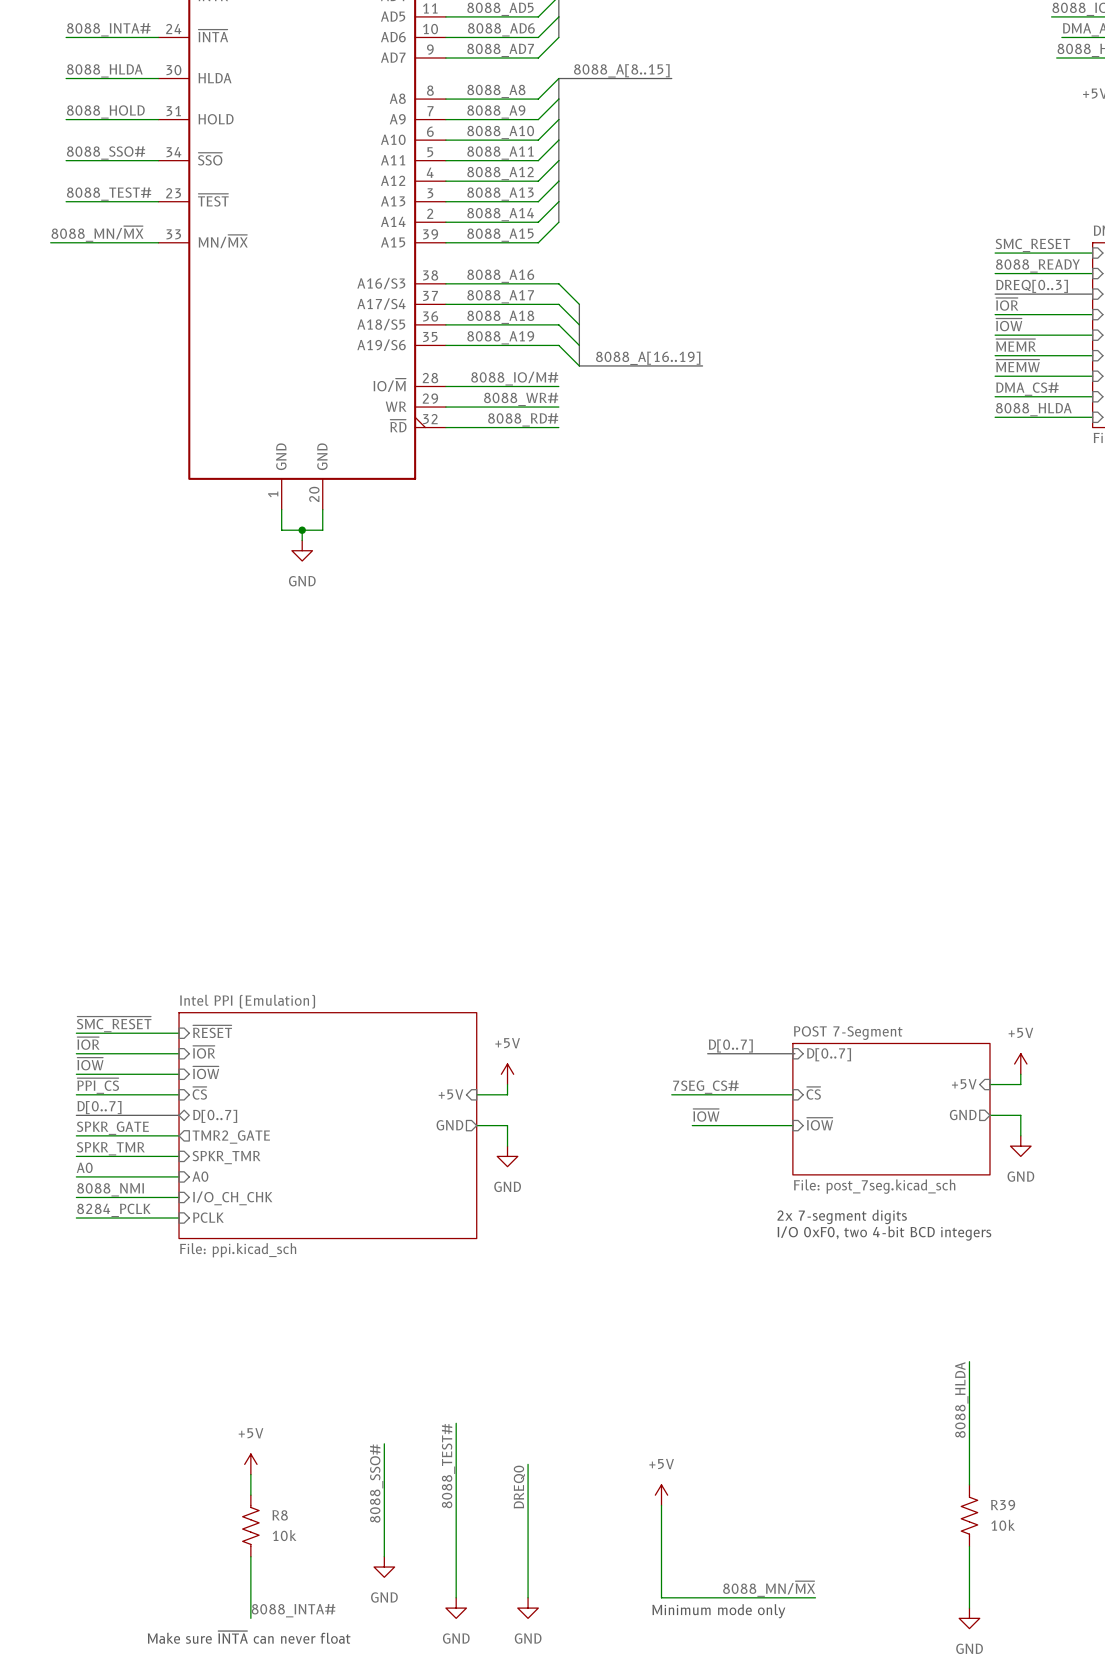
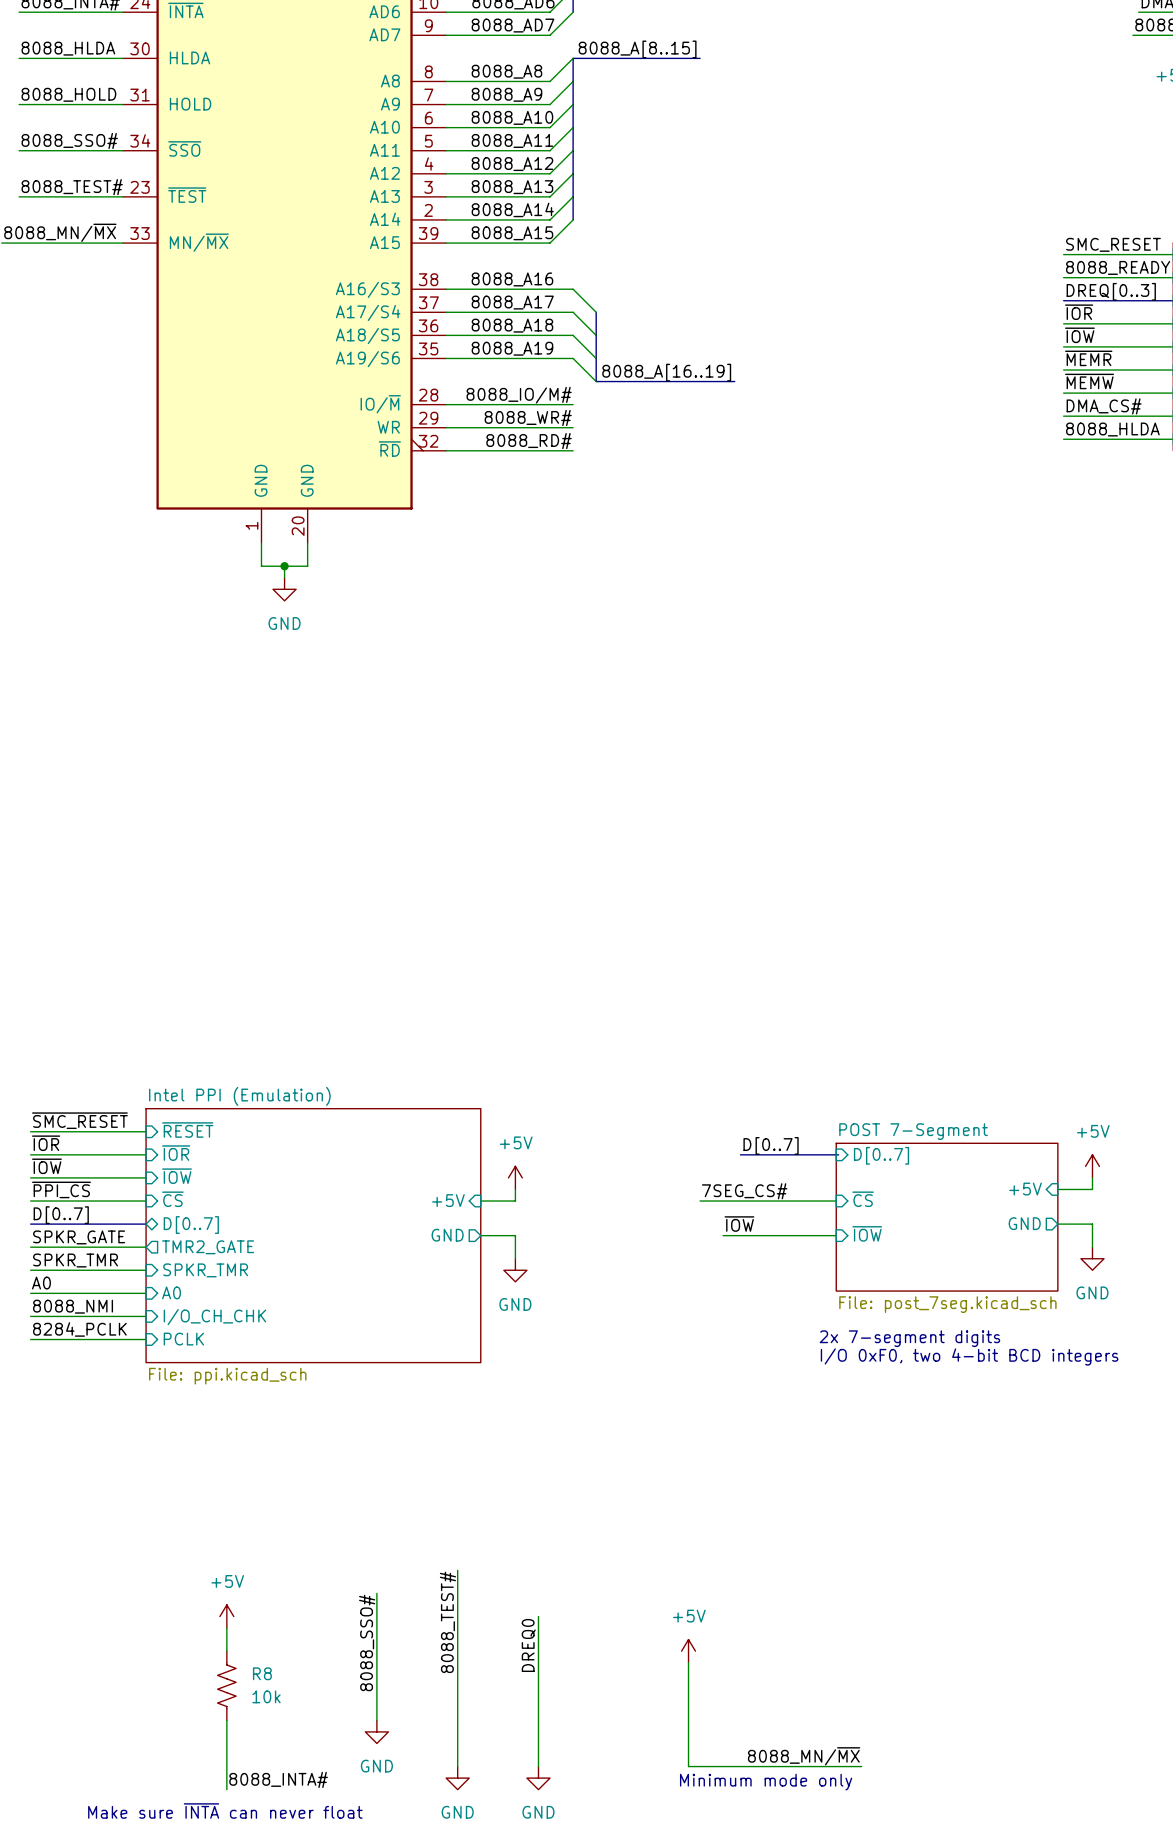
wire: (969, 1361) (969, 1484) -> none
label: 8088_HLDA (961, 1399) -> none
R39: 10k (969, 1515) -> none
wire: (969, 1546) (969, 1608) -> none
power symbol: GND (969, 1618) -> none

